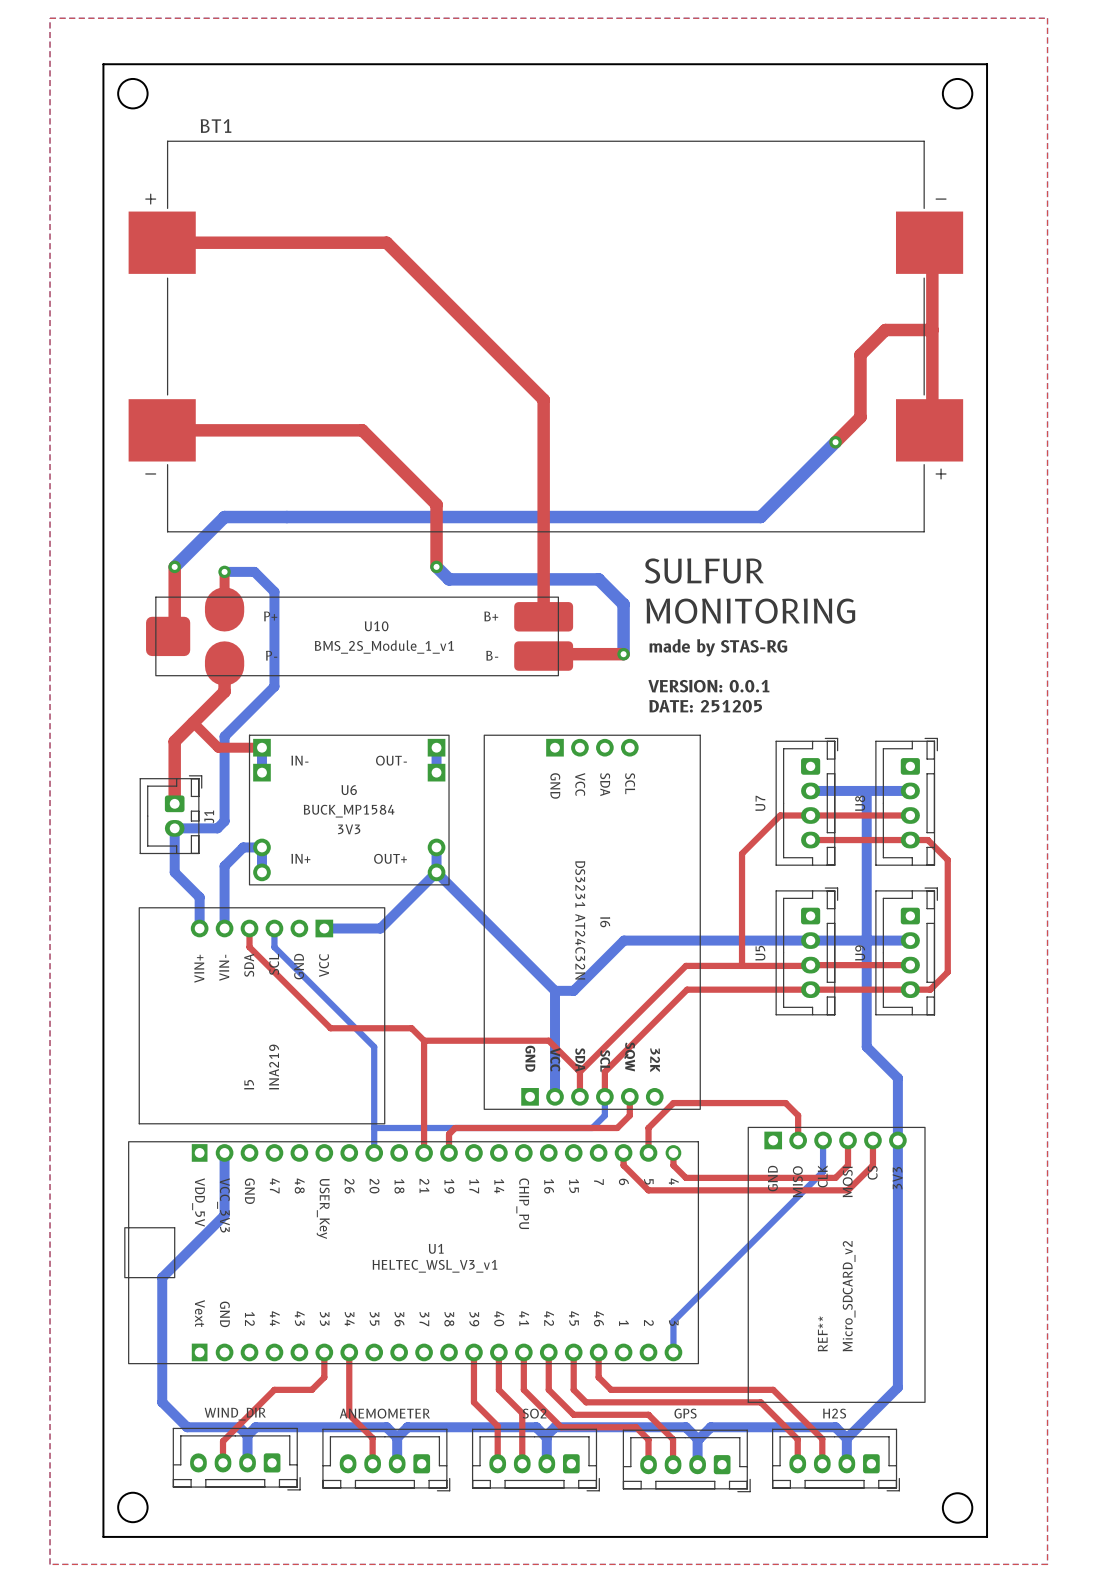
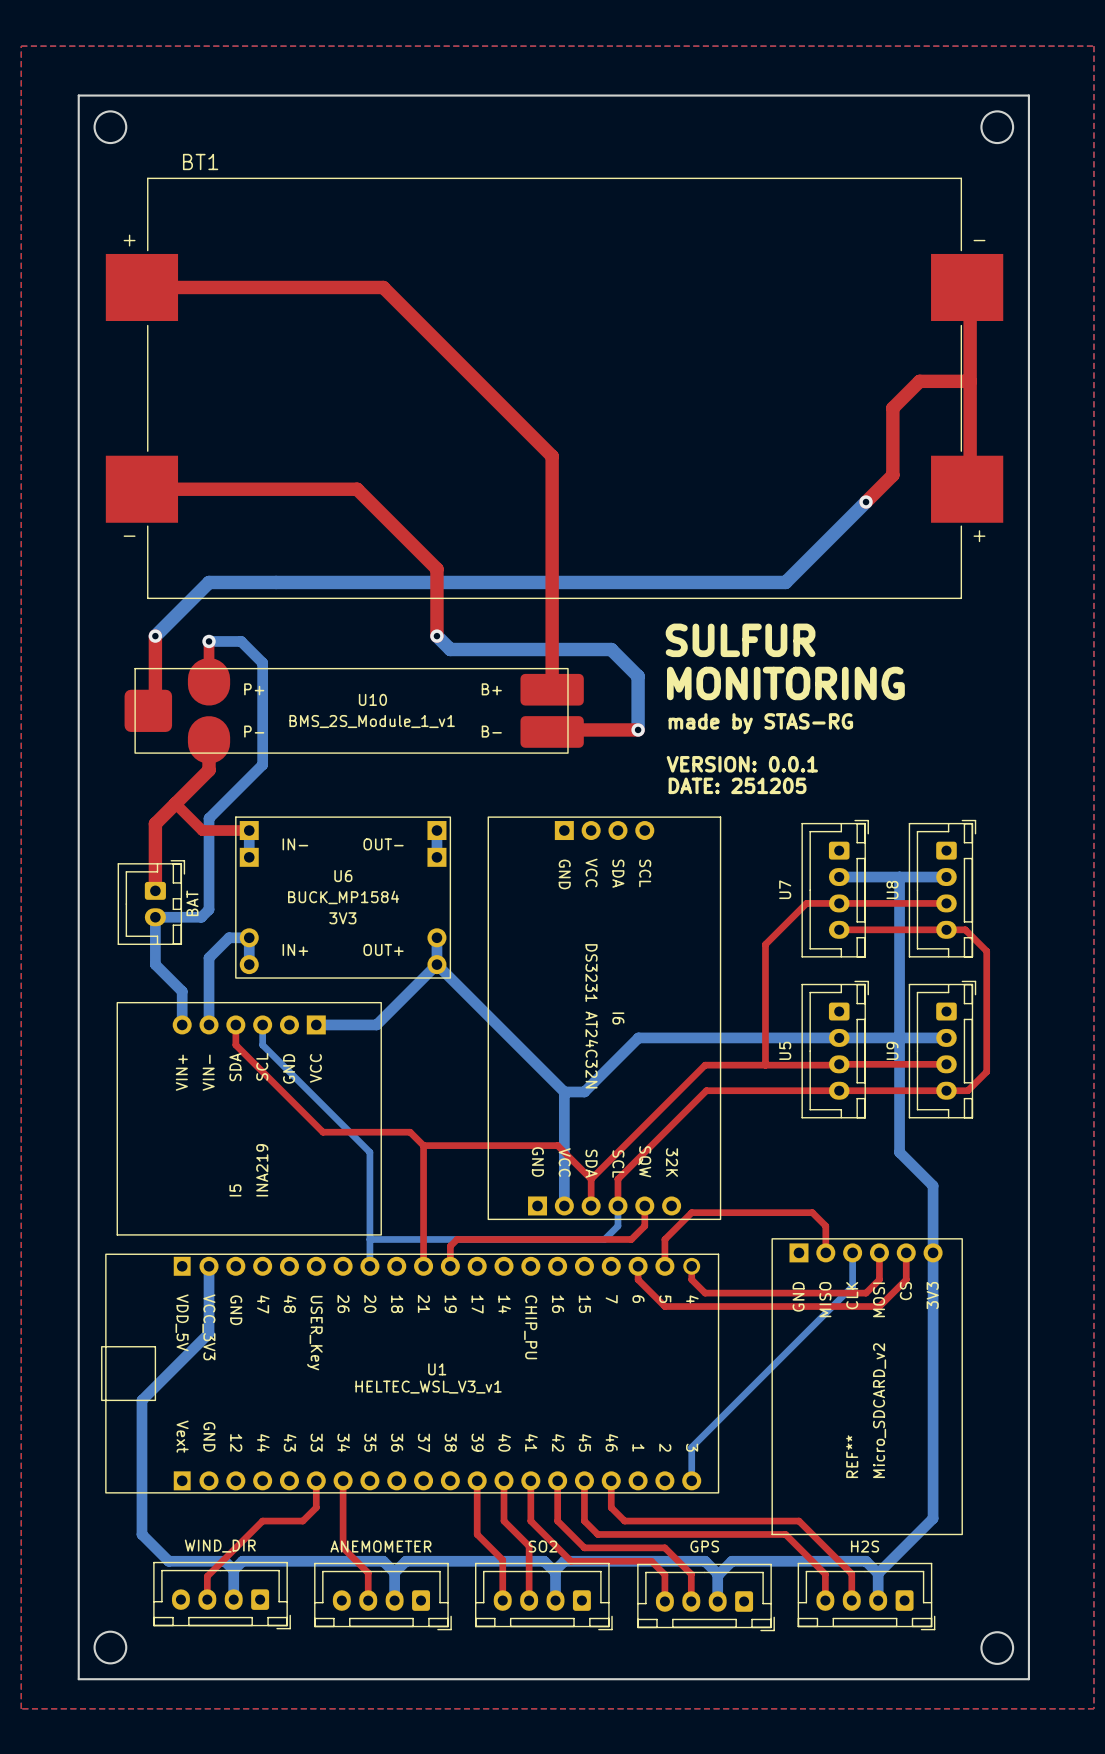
J1 name: J1 (209, 816) -> BAT (192, 903)

